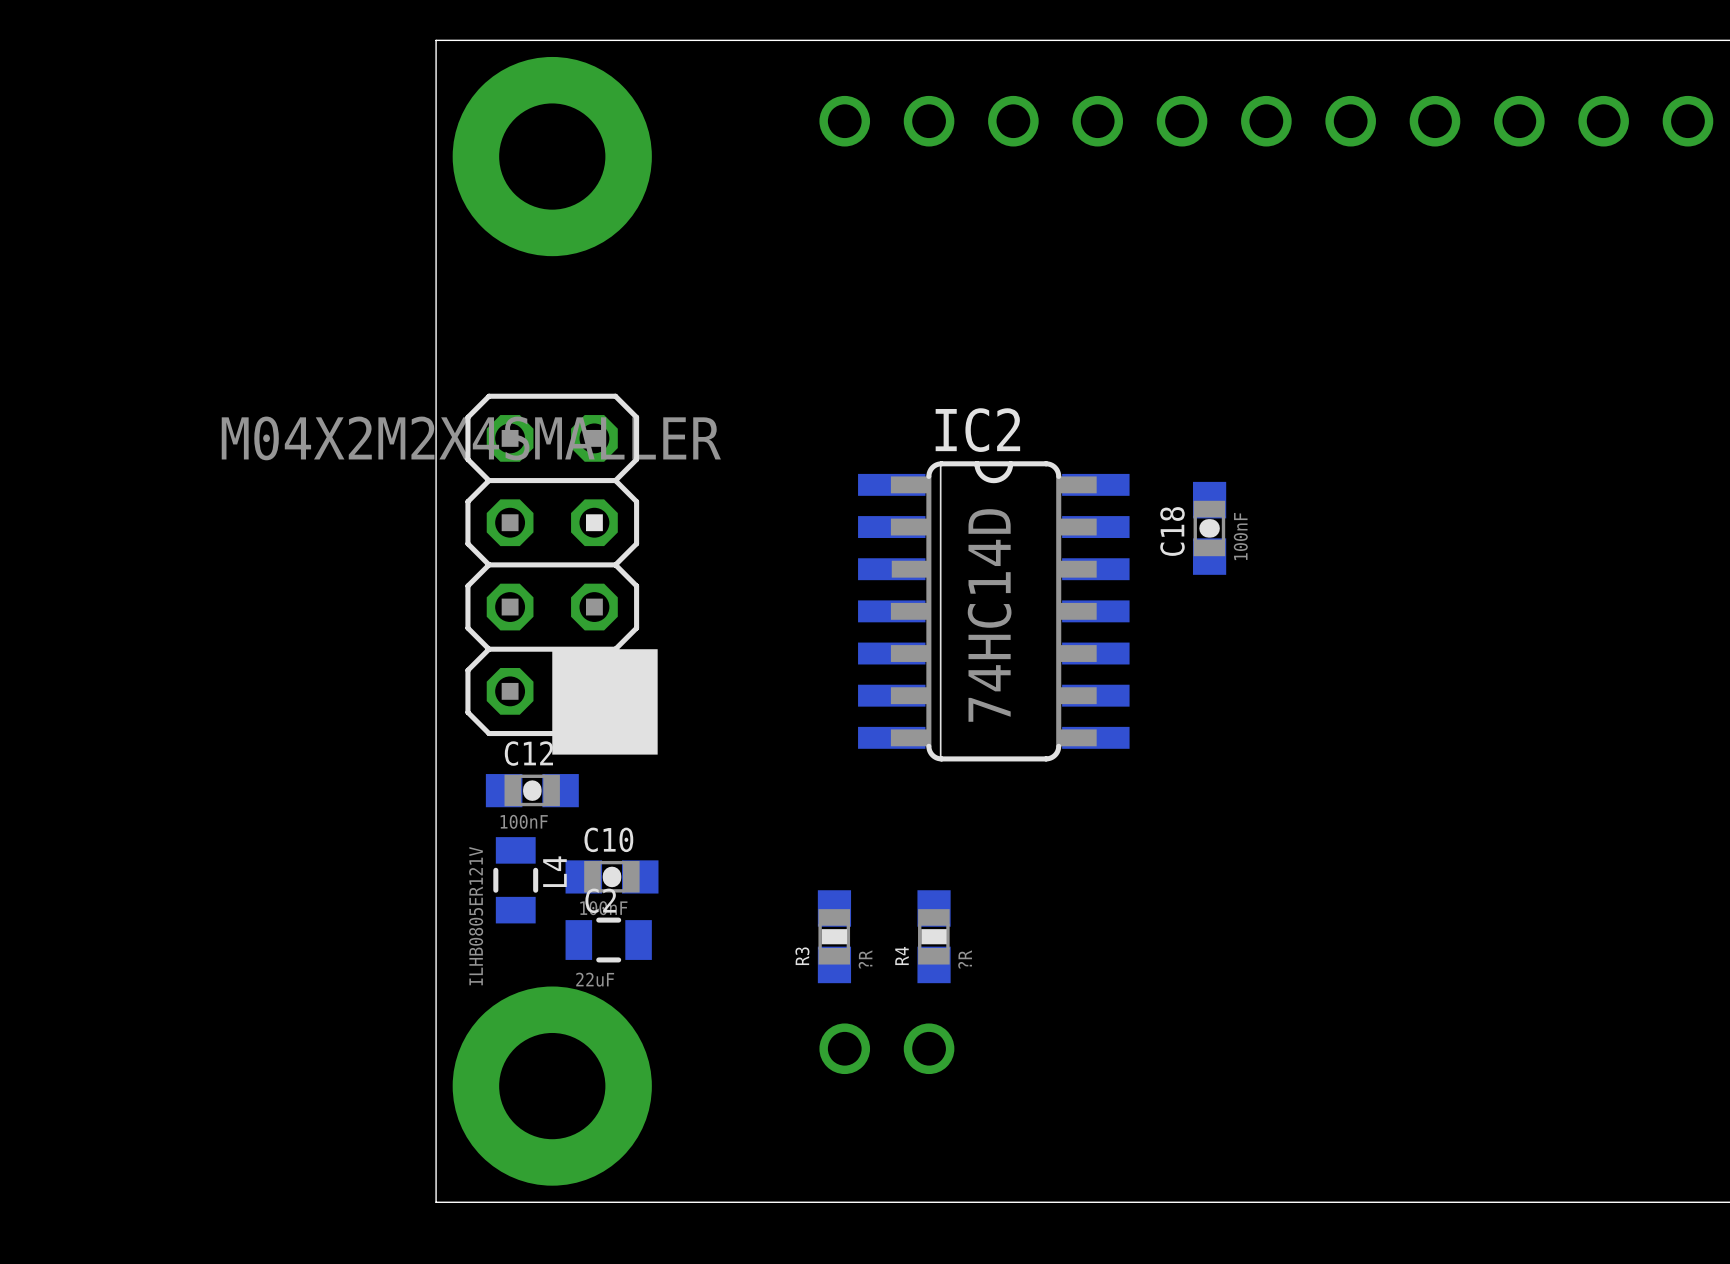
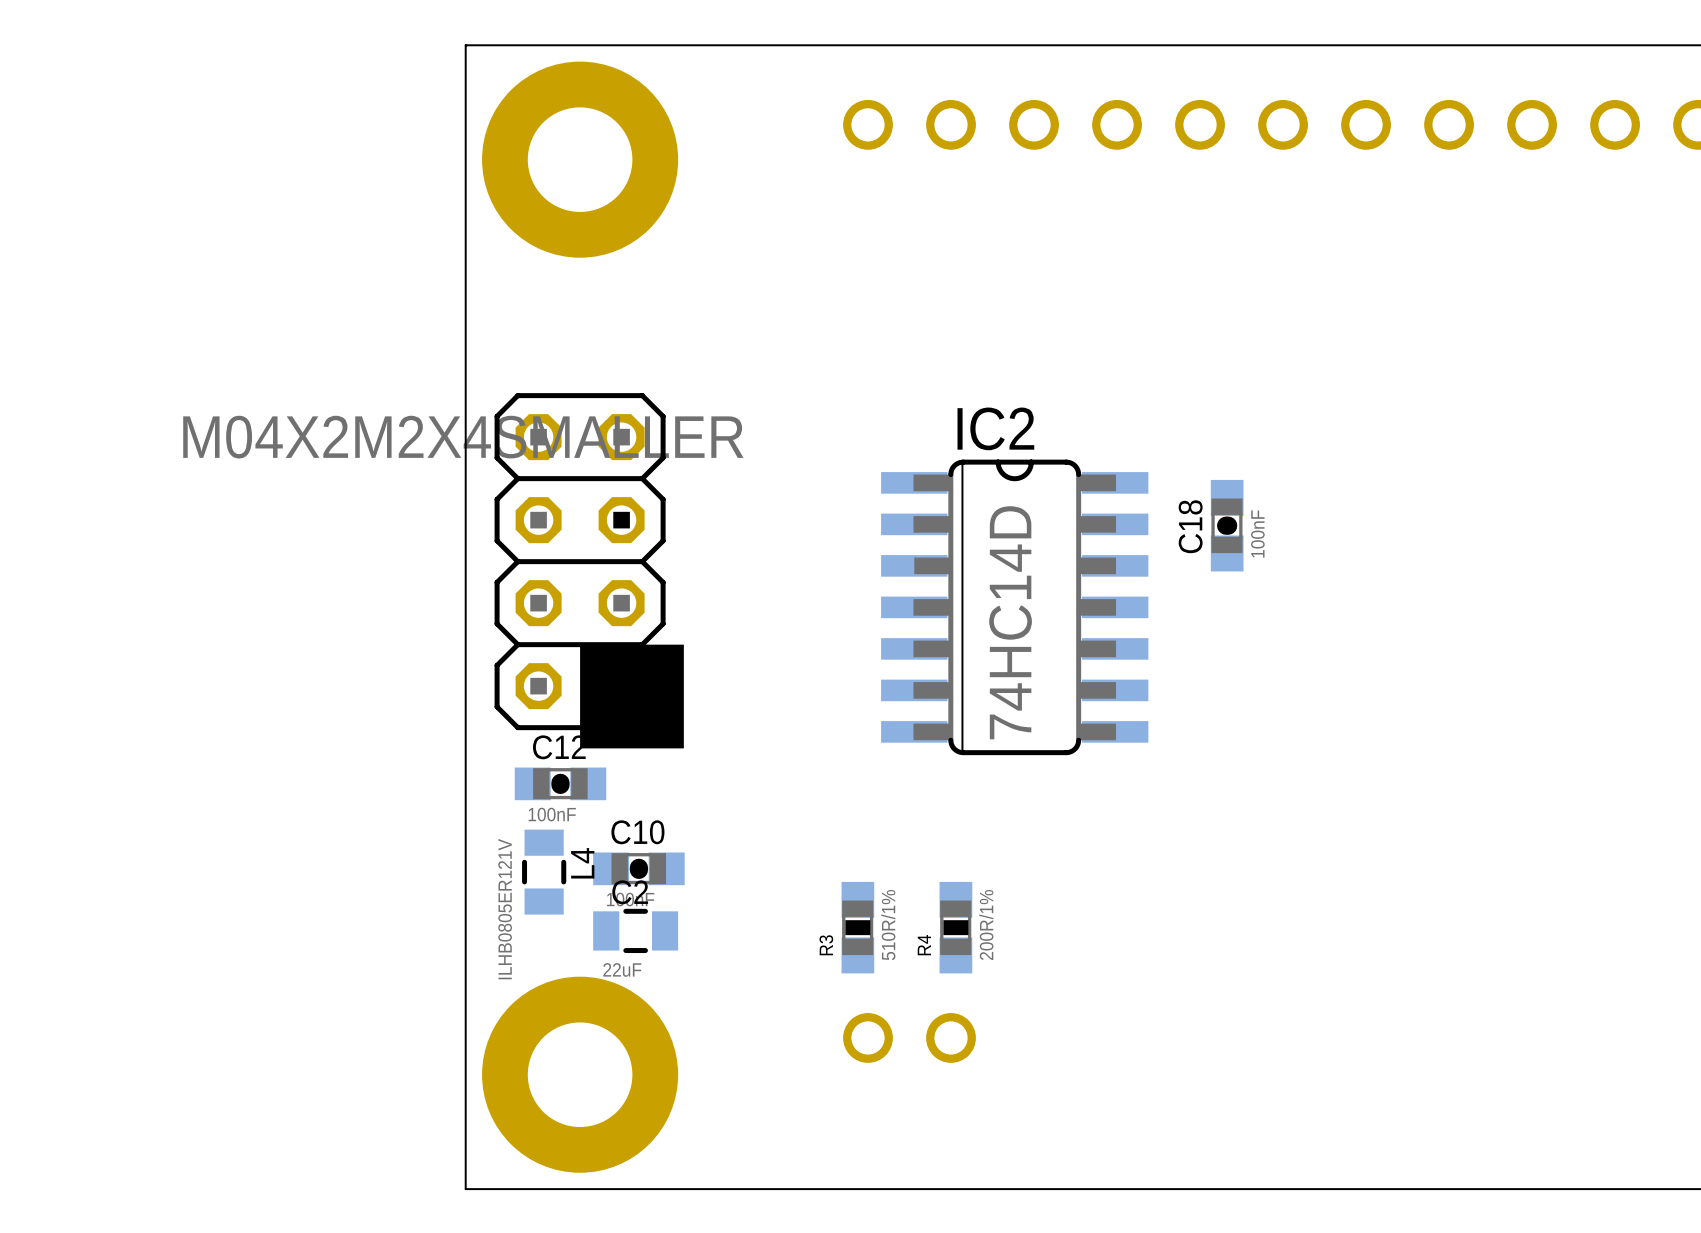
R3 value: ?R (865, 959) -> 510R/1% (888, 925)
R4 value: ?R (965, 959) -> 200R/1% (986, 924)

